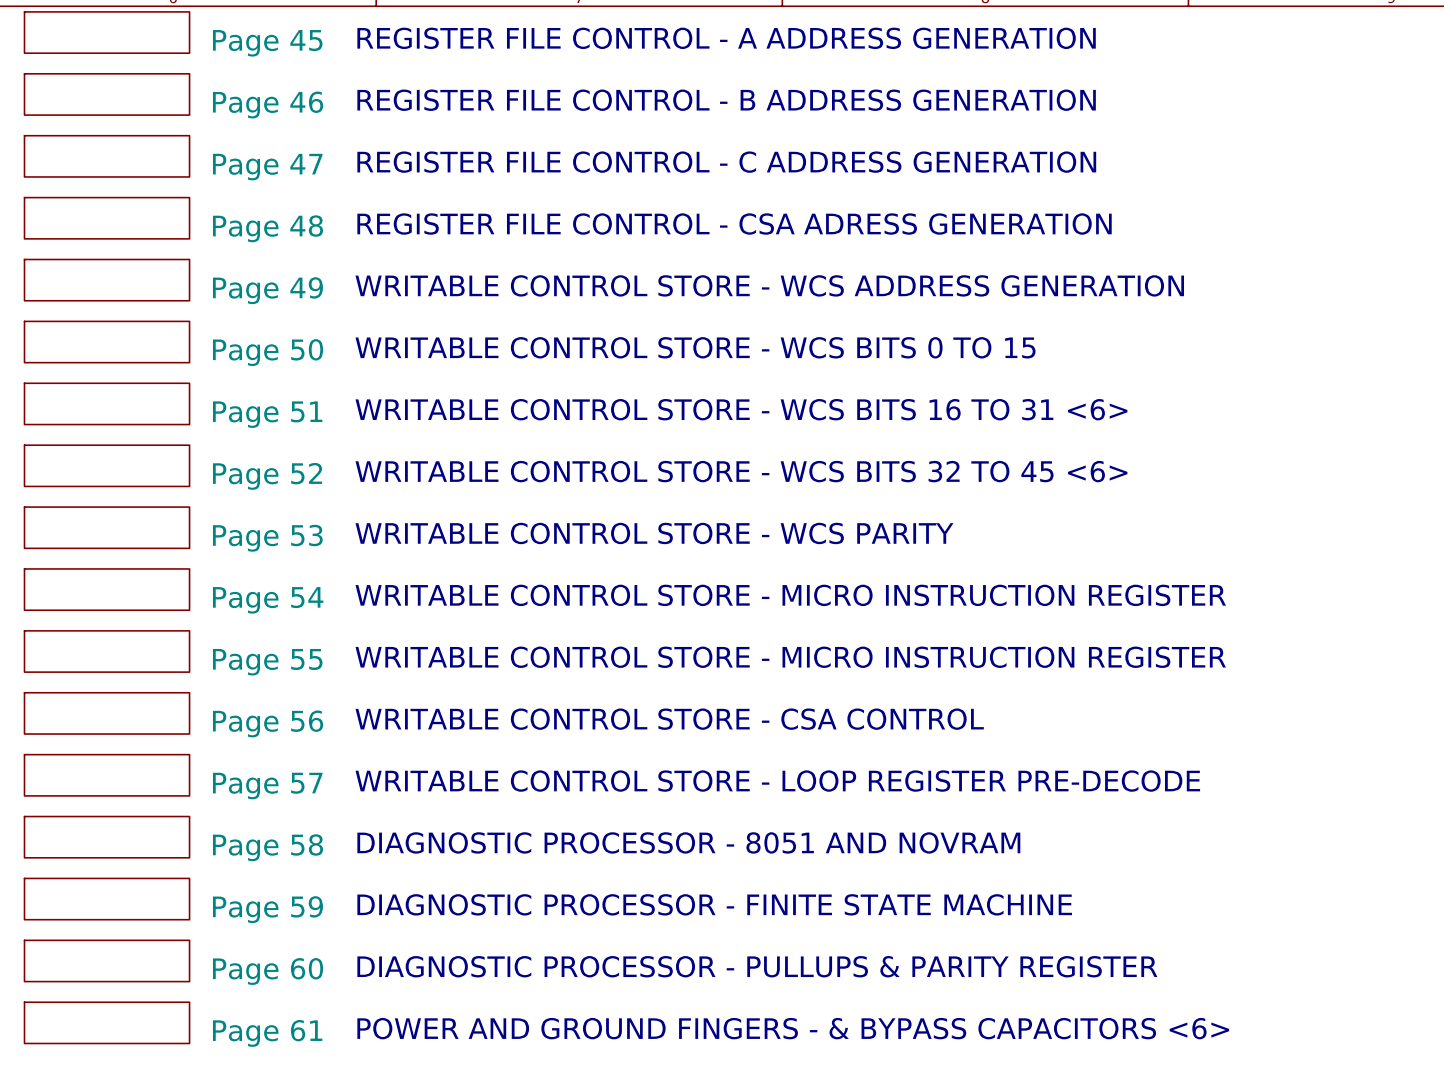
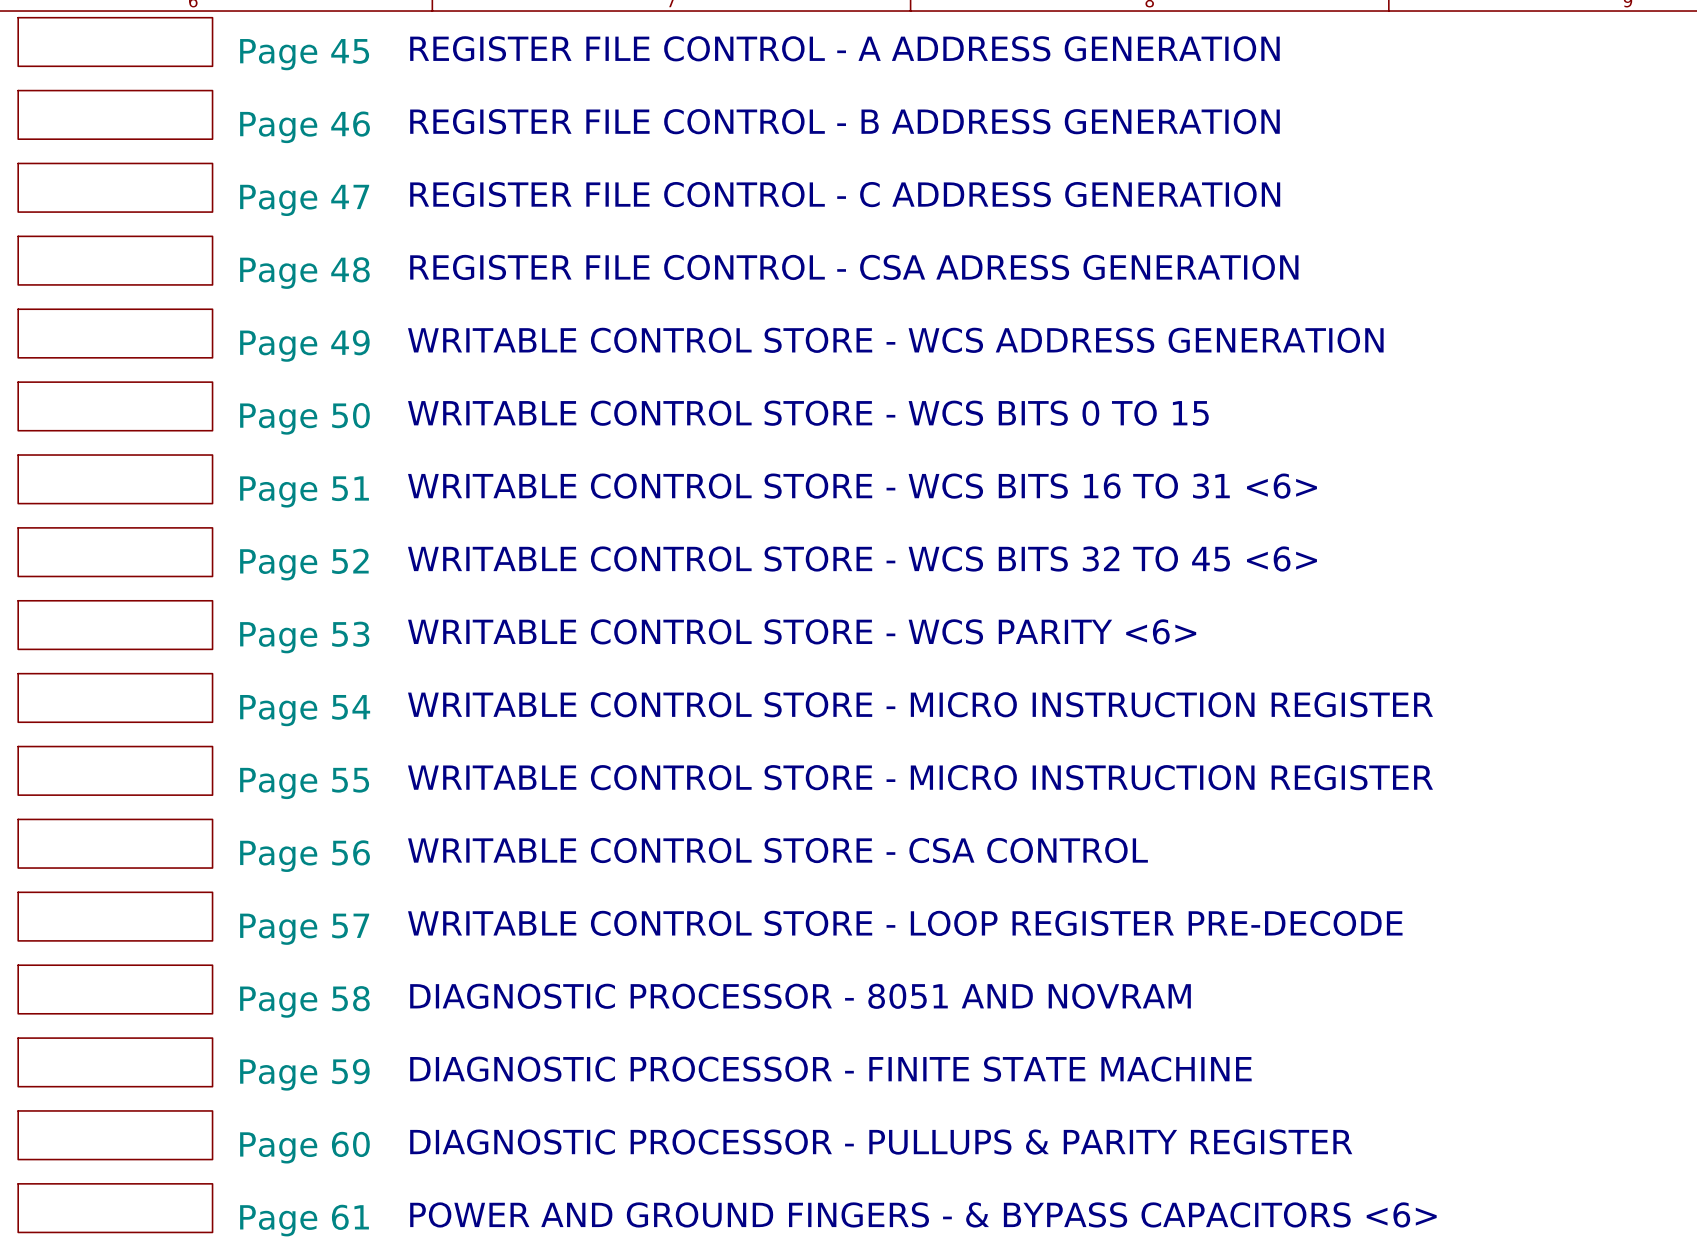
text: WRITABLE CONTROL STORE - WCS PARITY (654, 533) -> WRITABLE CONTROL STORE - WCS PARITY <6> (802, 631)

